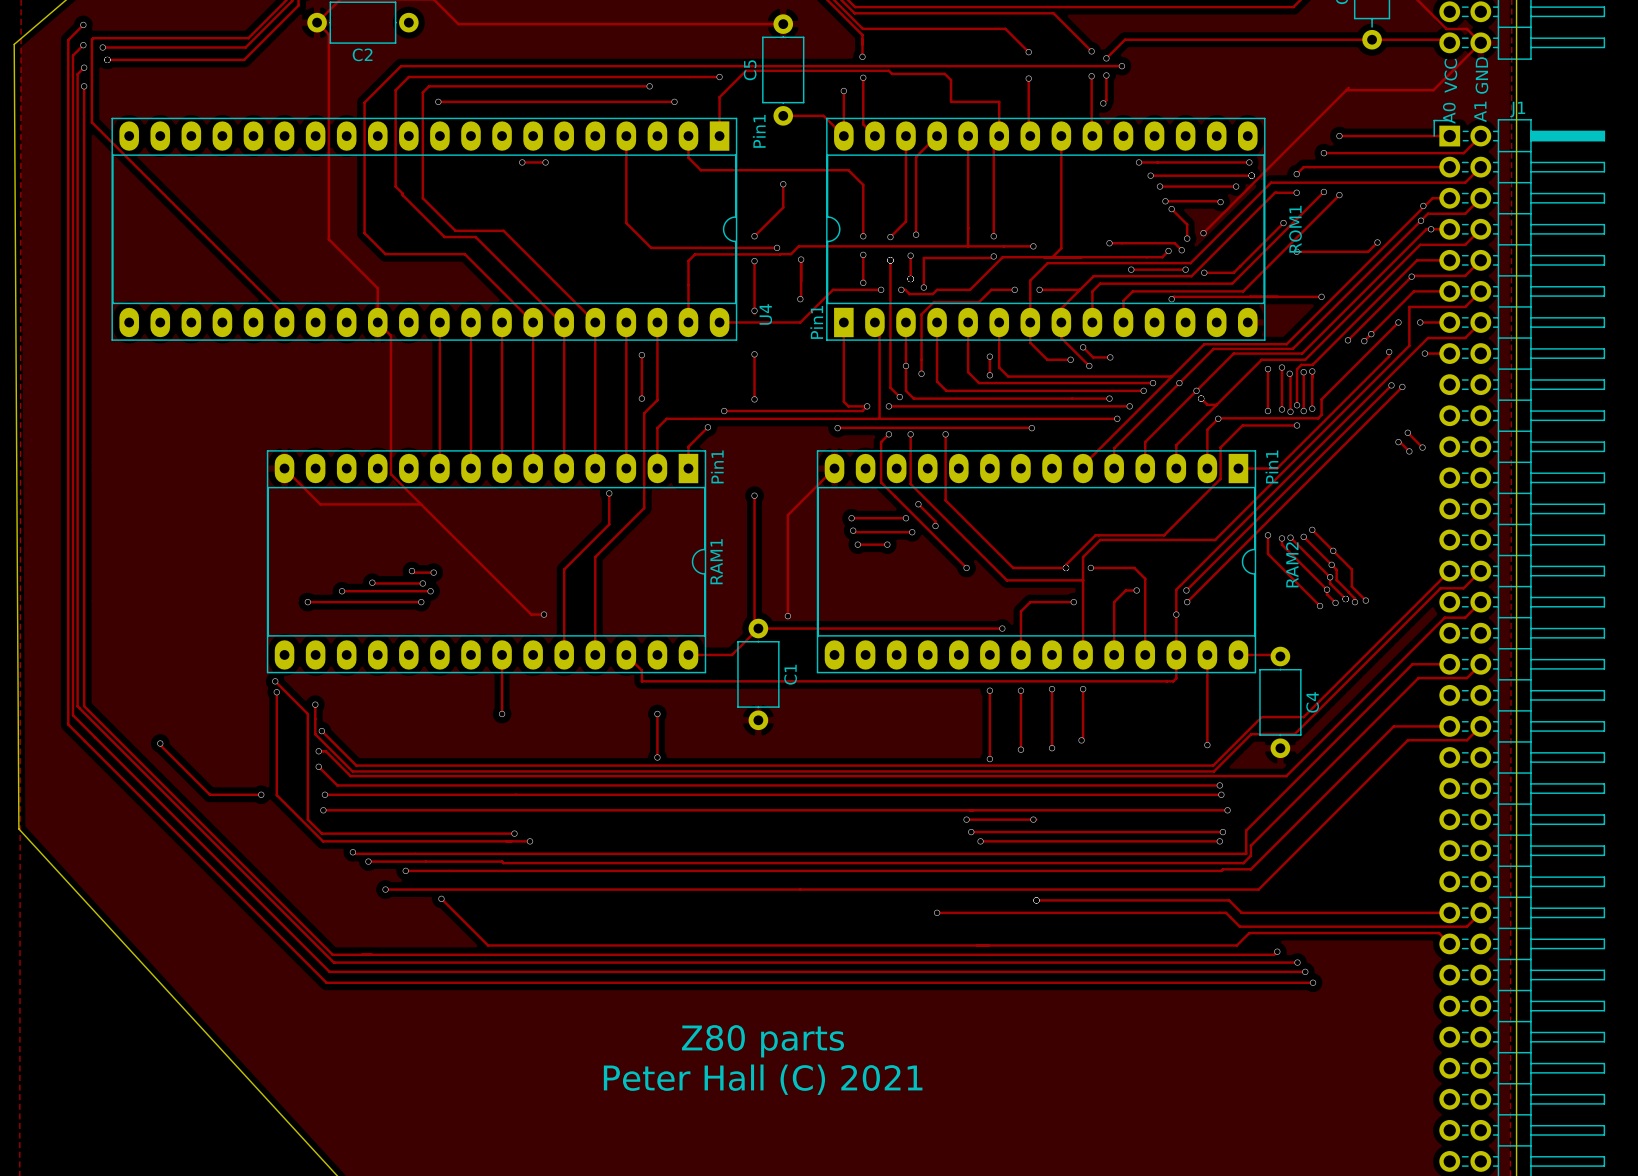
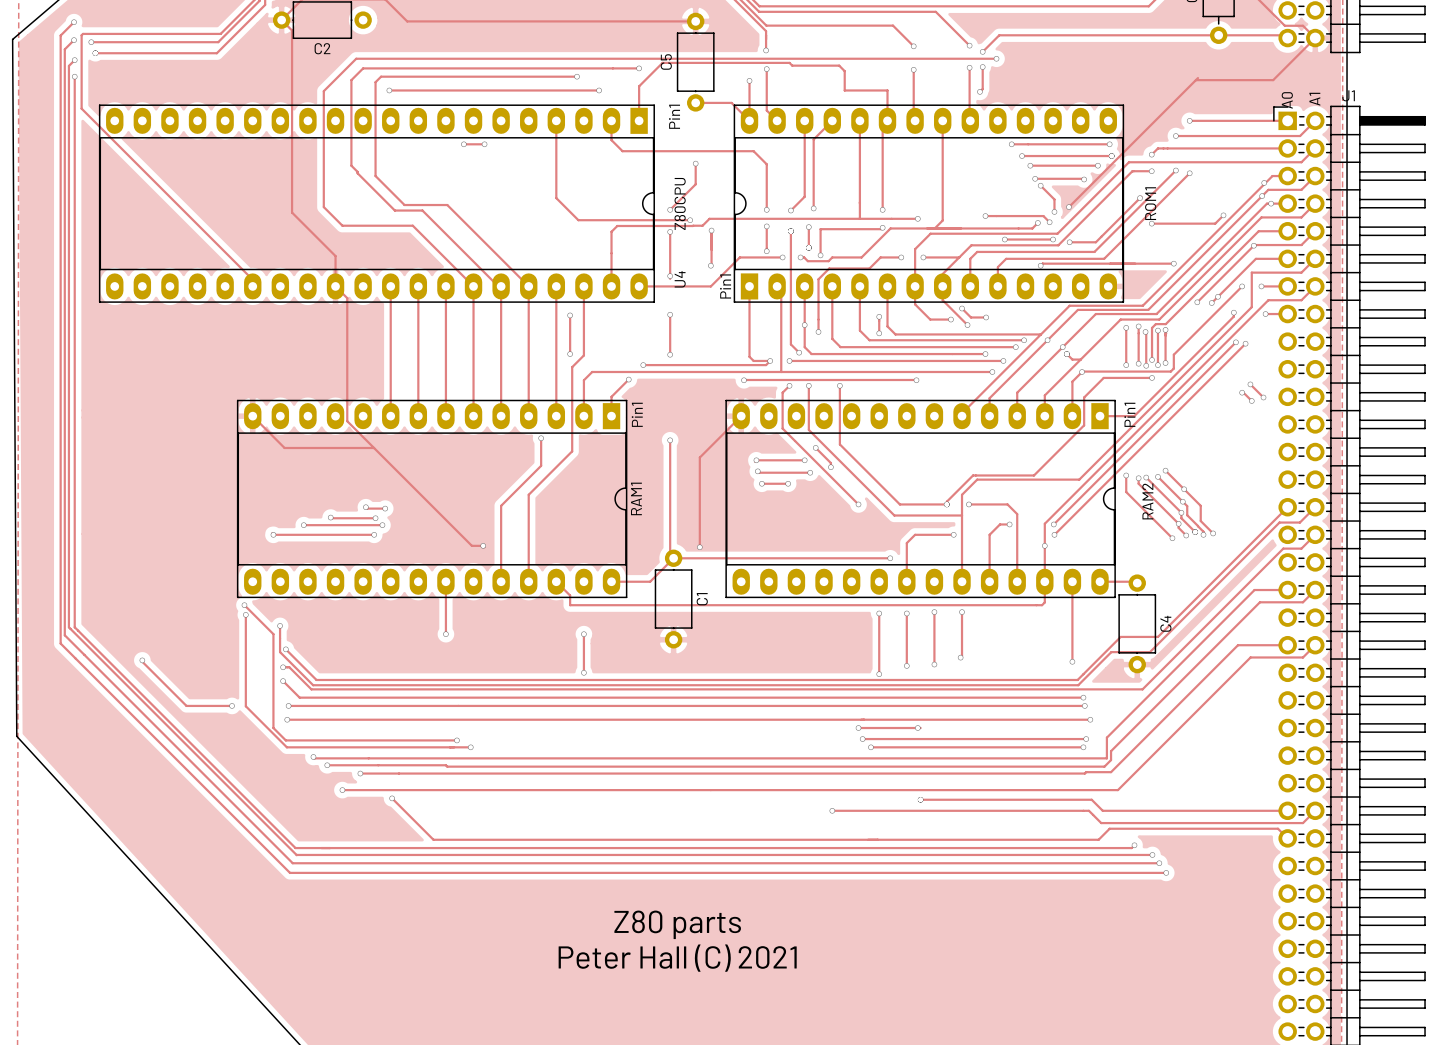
text: VCC (1450, 75) -> none
text: GND (1481, 75) -> none
U4 value: none -> Z80CPU (680, 203)

